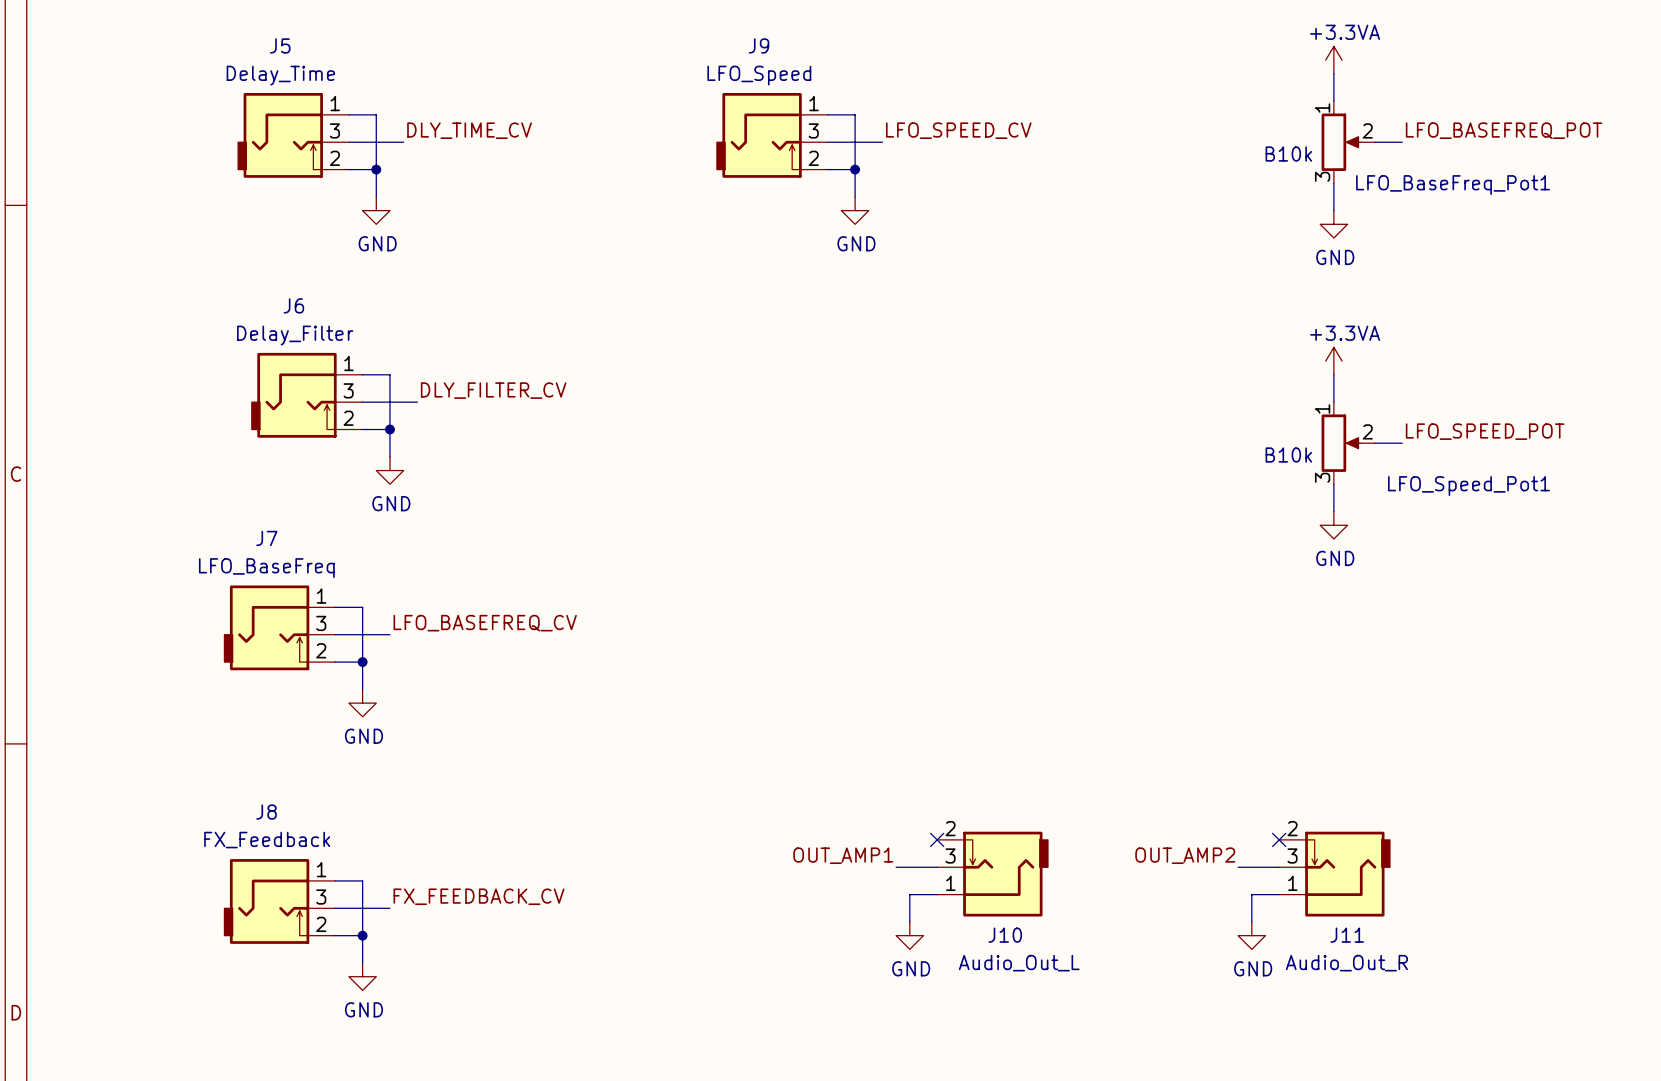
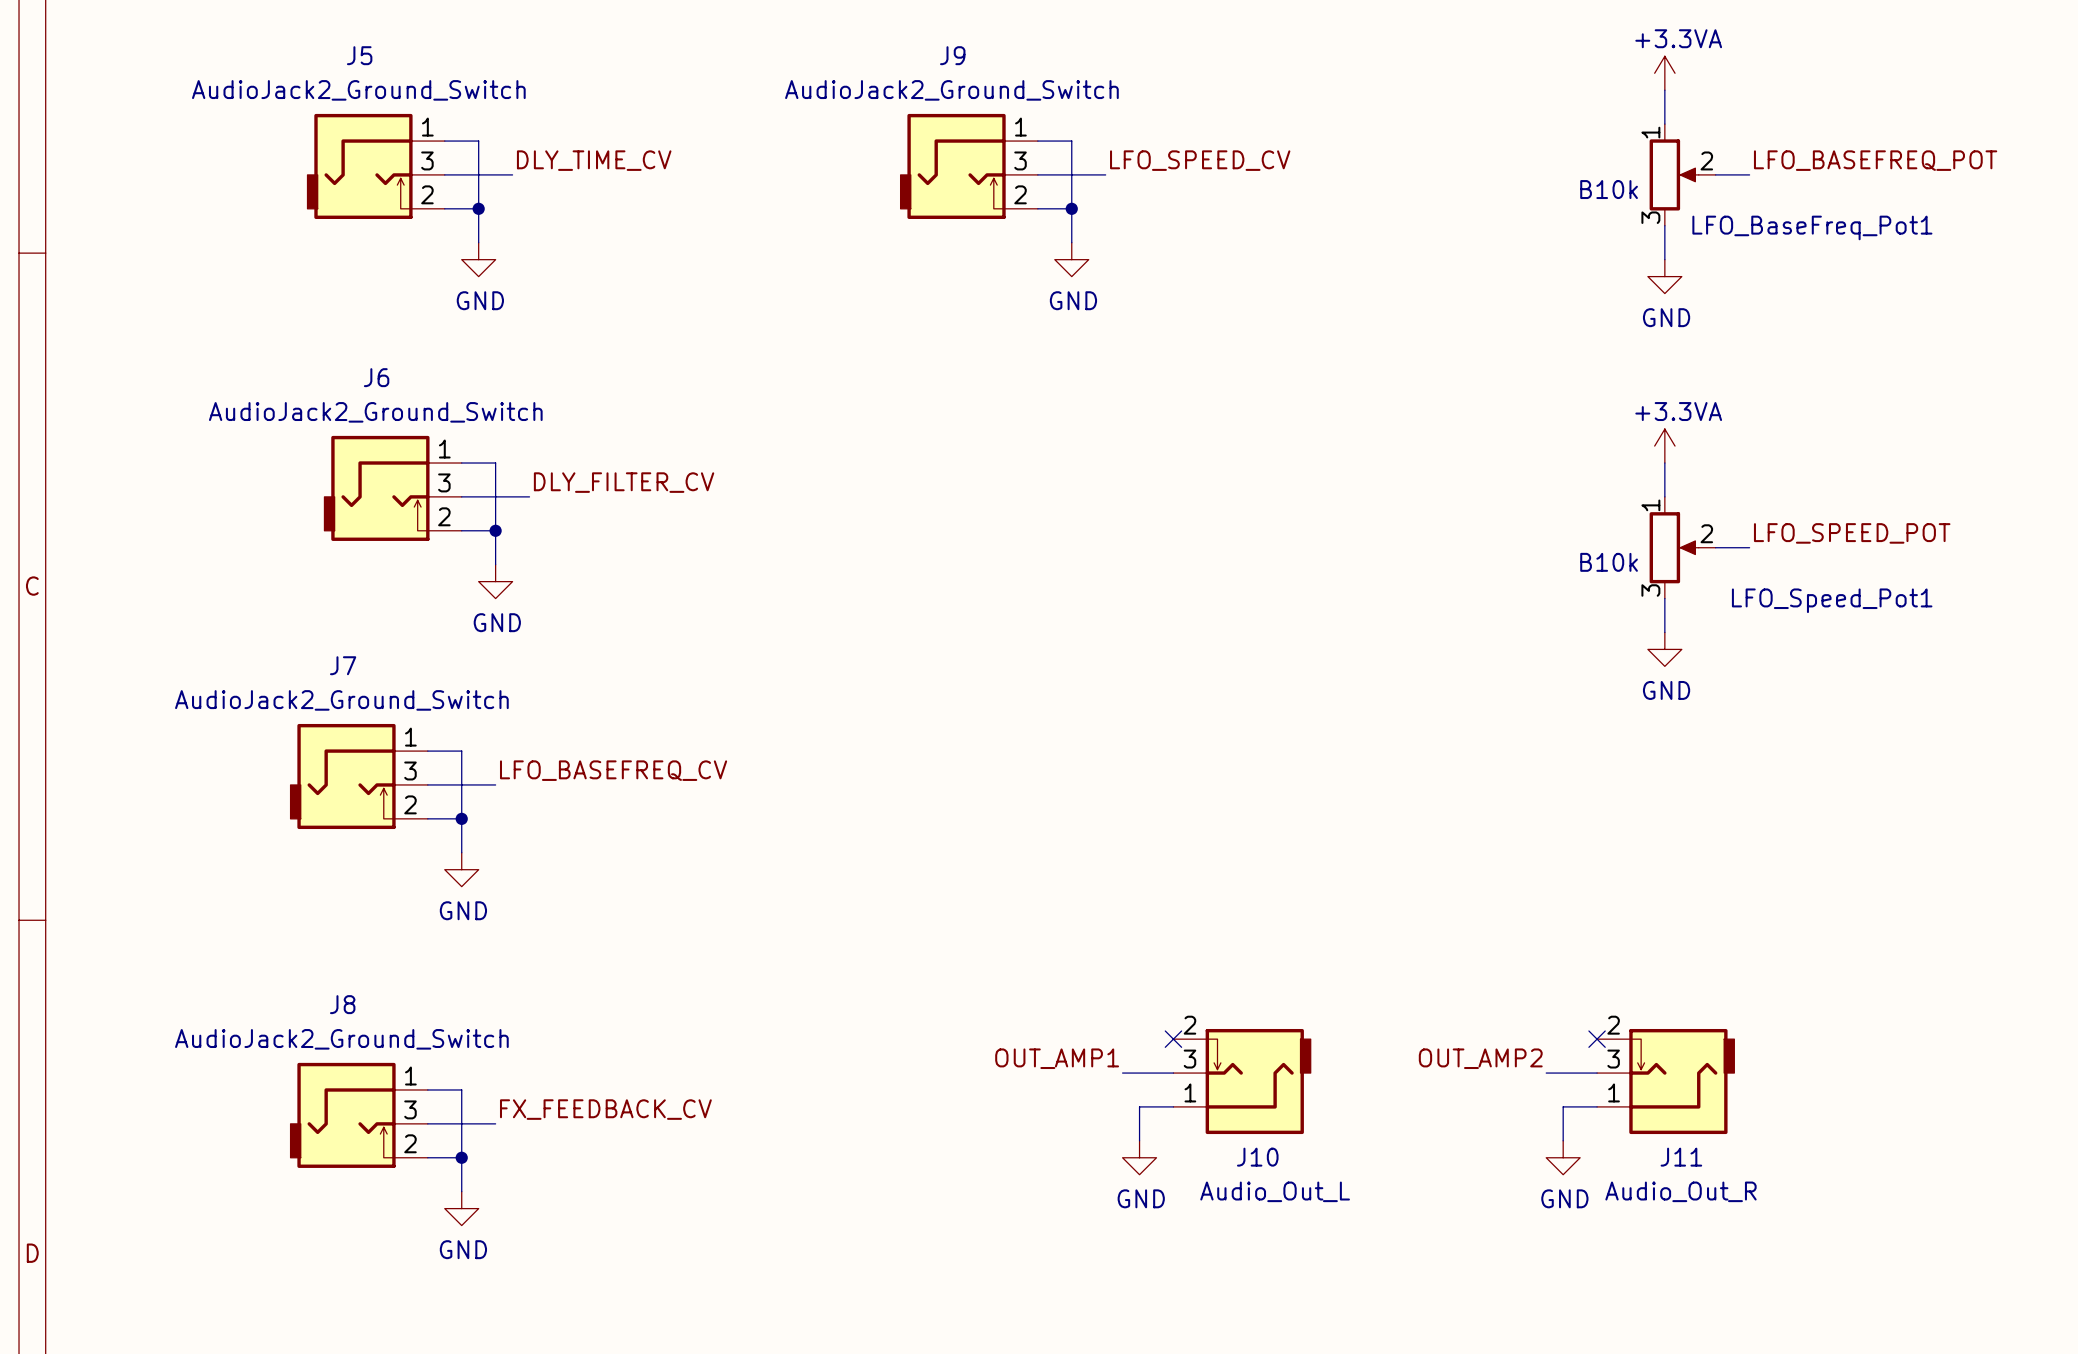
J5 value: Delay_Time (280, 75) -> AudioJack2_Ground_Switch (358, 90)
J9 value: LFO_Speed (759, 75) -> AudioJack2_Ground_Switch (951, 90)
J6 value: Delay_Filter (295, 335) -> AudioJack2_Ground_Switch (375, 412)
J7 value: LFO_BaseFreq (266, 568) -> AudioJack2_Ground_Switch (341, 700)
J8 value: FX_Feedback (267, 840) -> AudioJack2_Ground_Switch (341, 1039)

